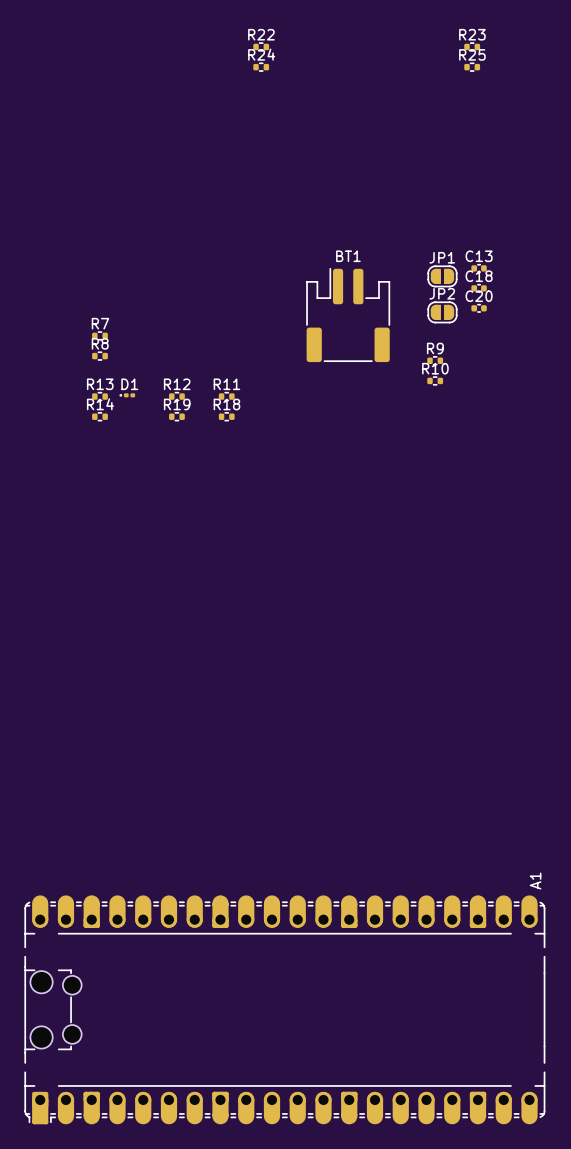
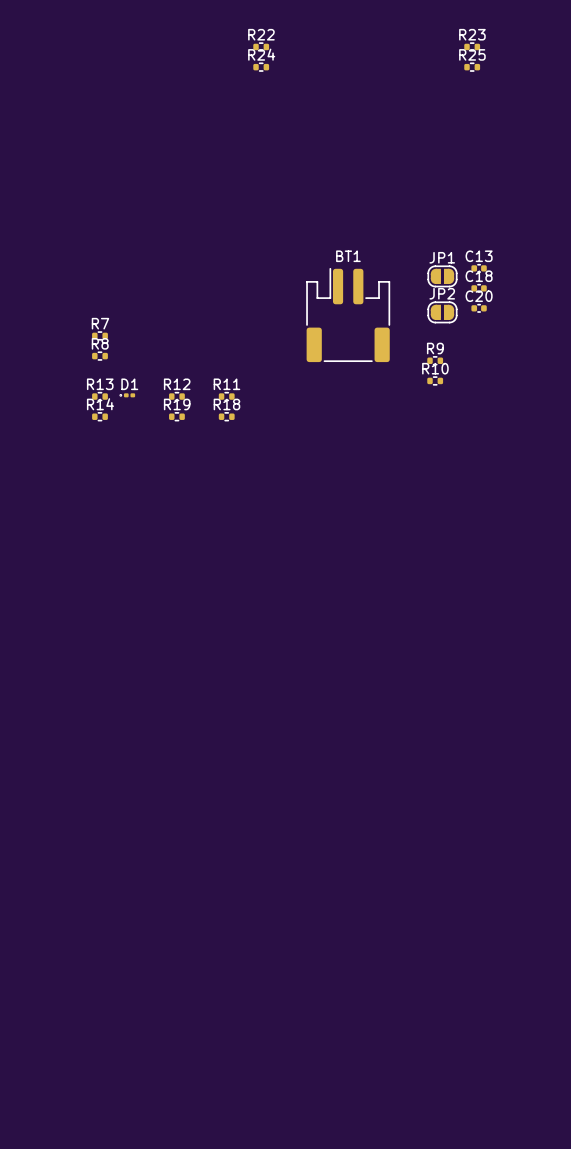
A1: (284, 1009) -> none

